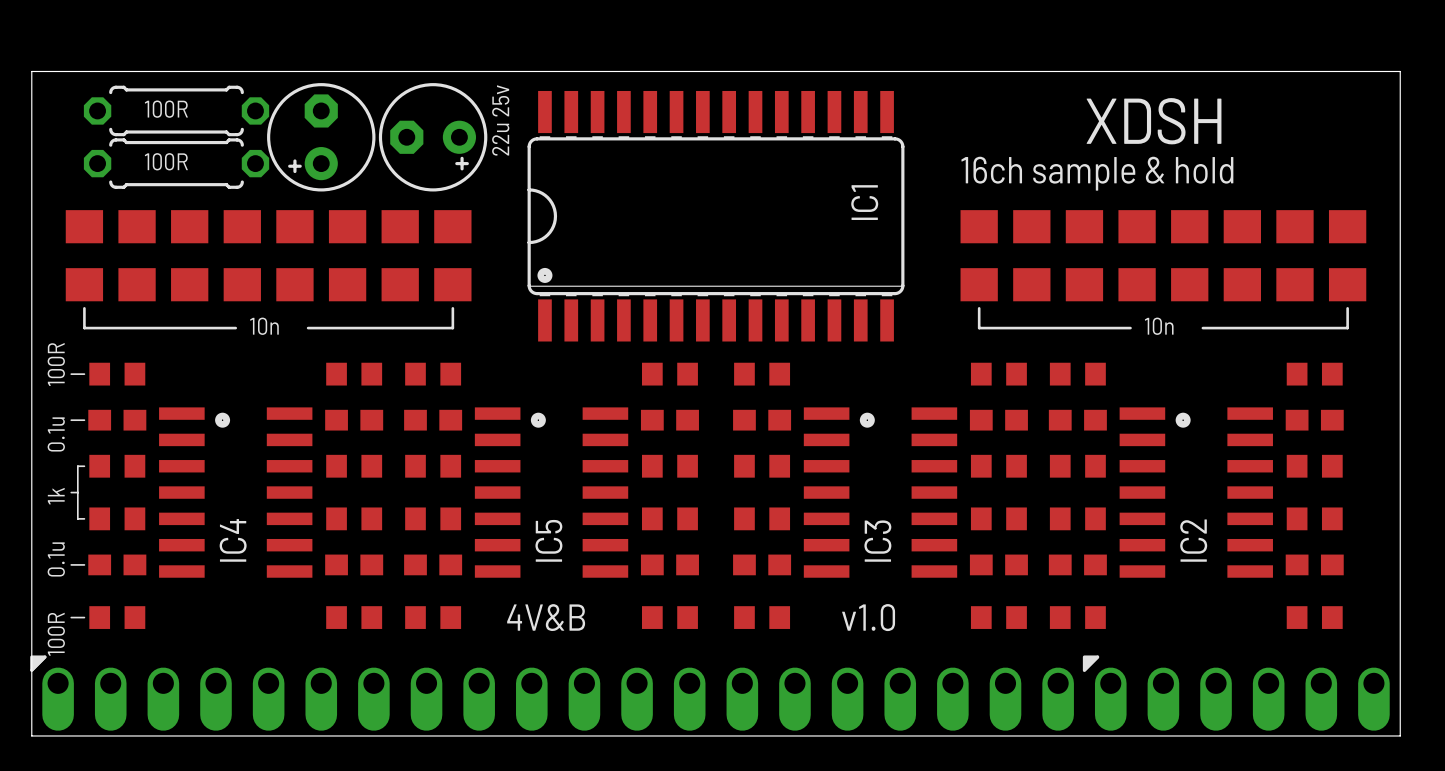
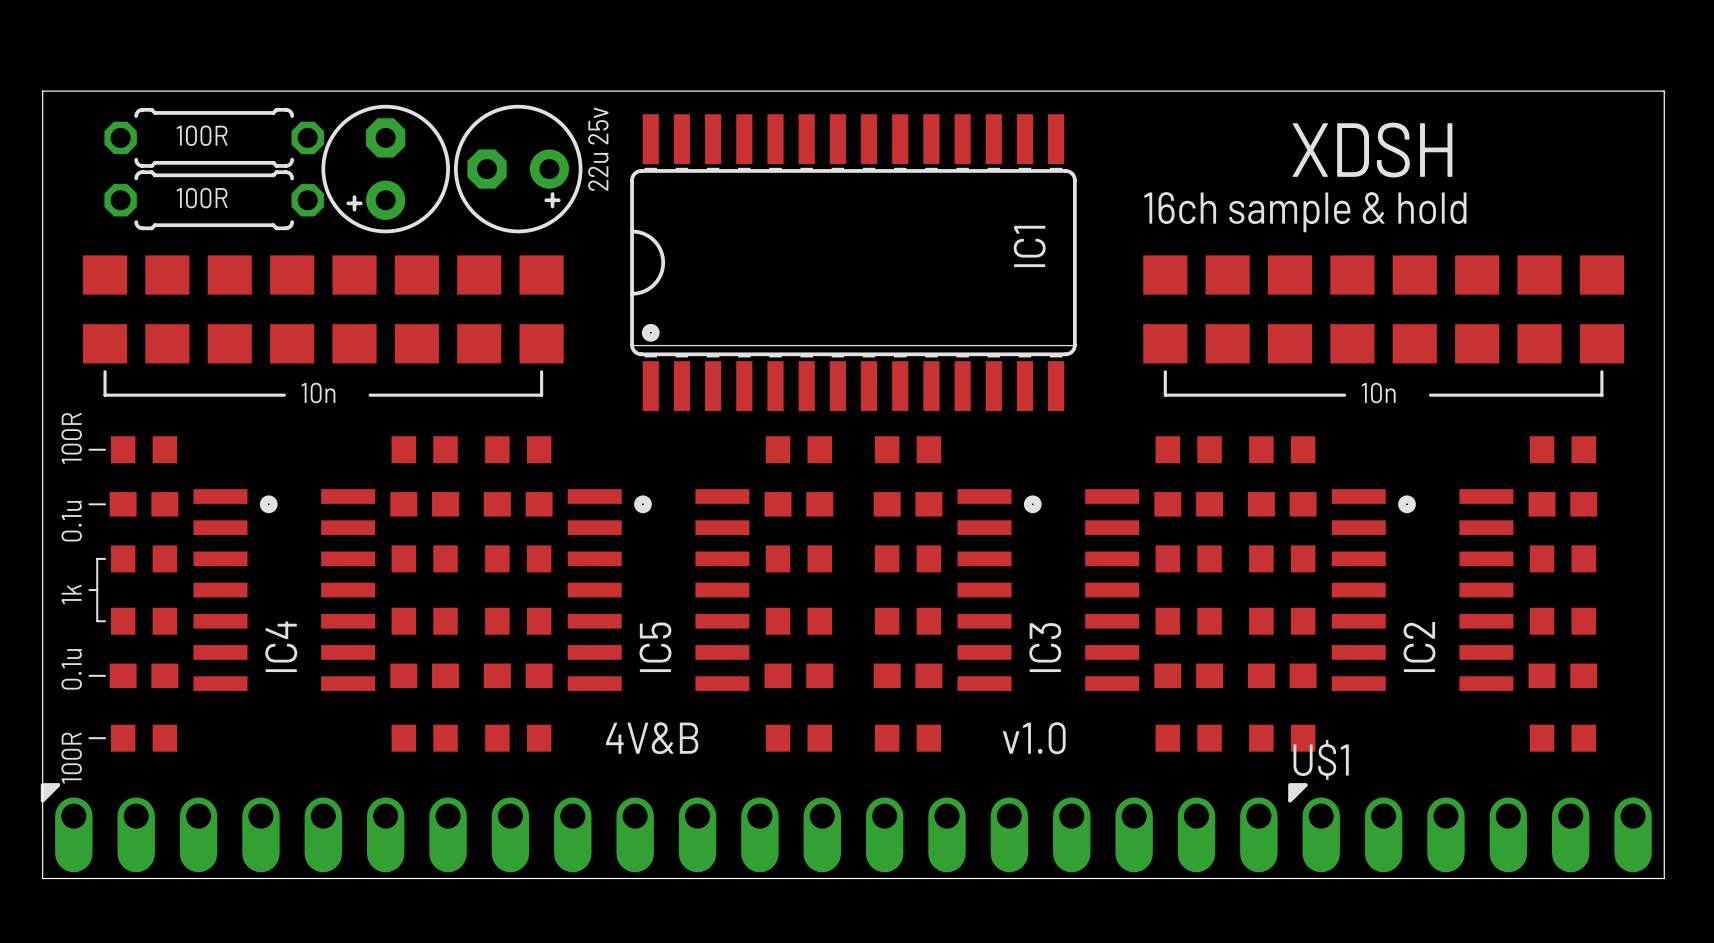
U$1 name: none -> U$1 (1321, 759)

